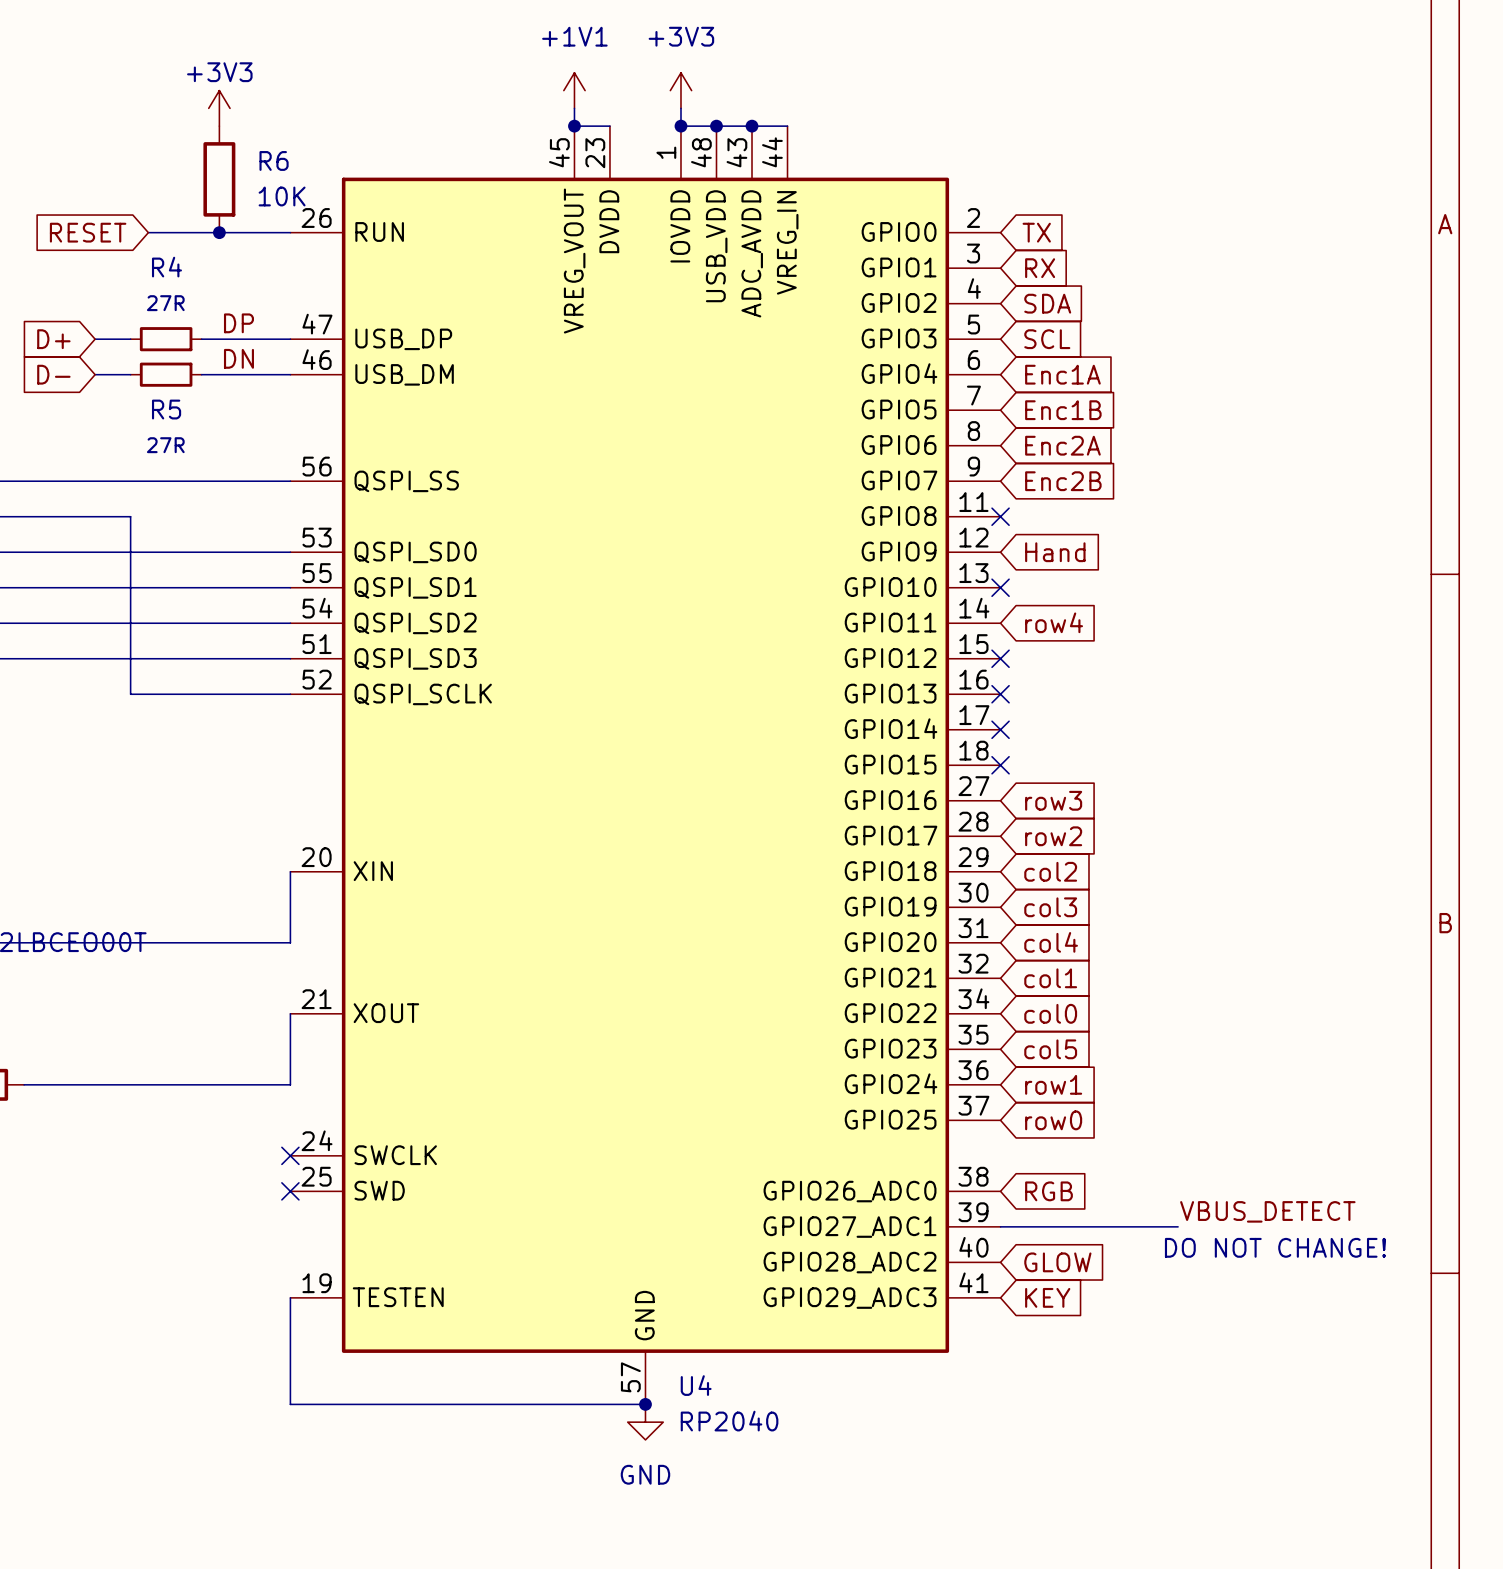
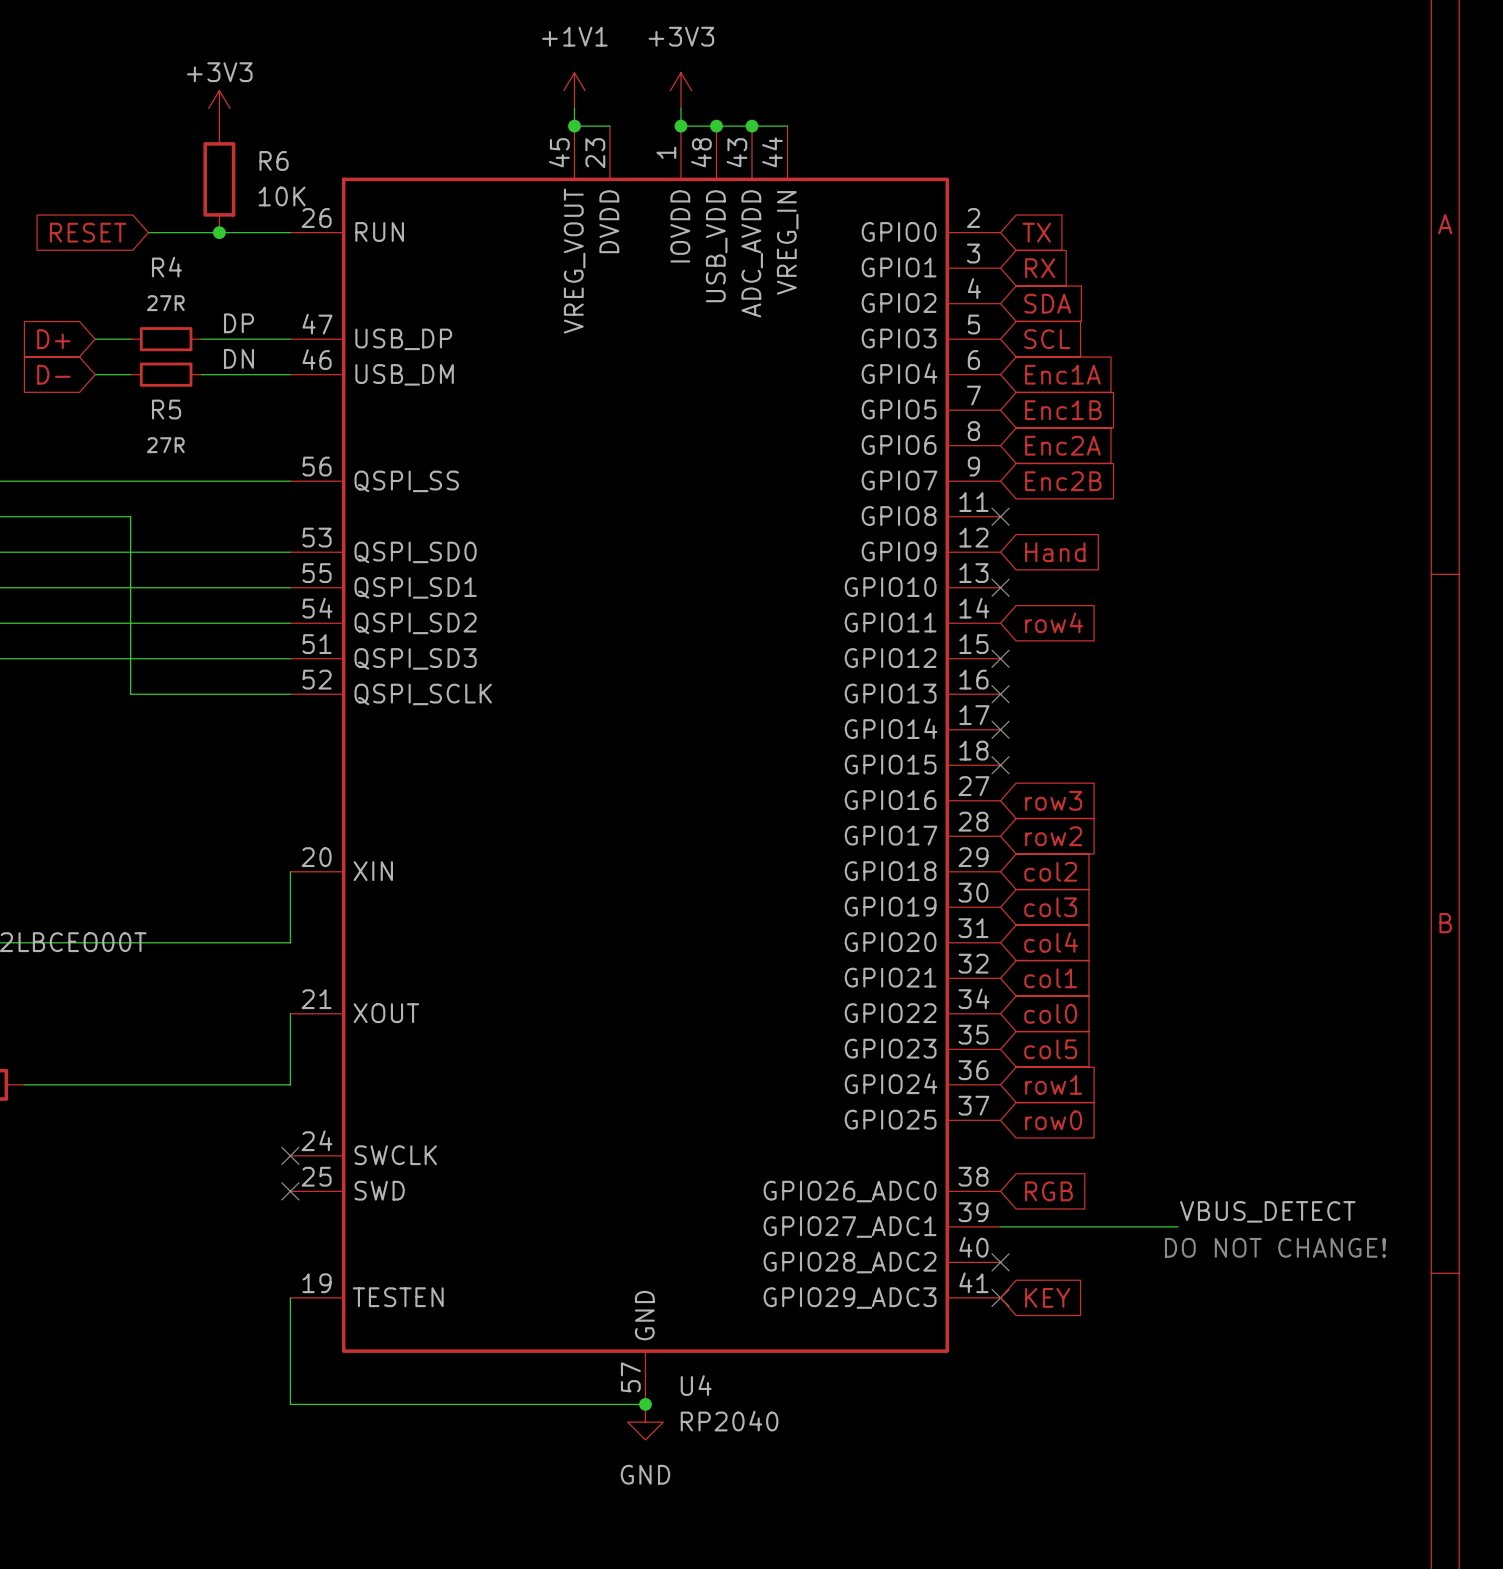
no-connect mark: none -> (1000, 1262)
global label: GLOW (1057, 1262) -> none
no-connect mark: none -> (1000, 1297)

